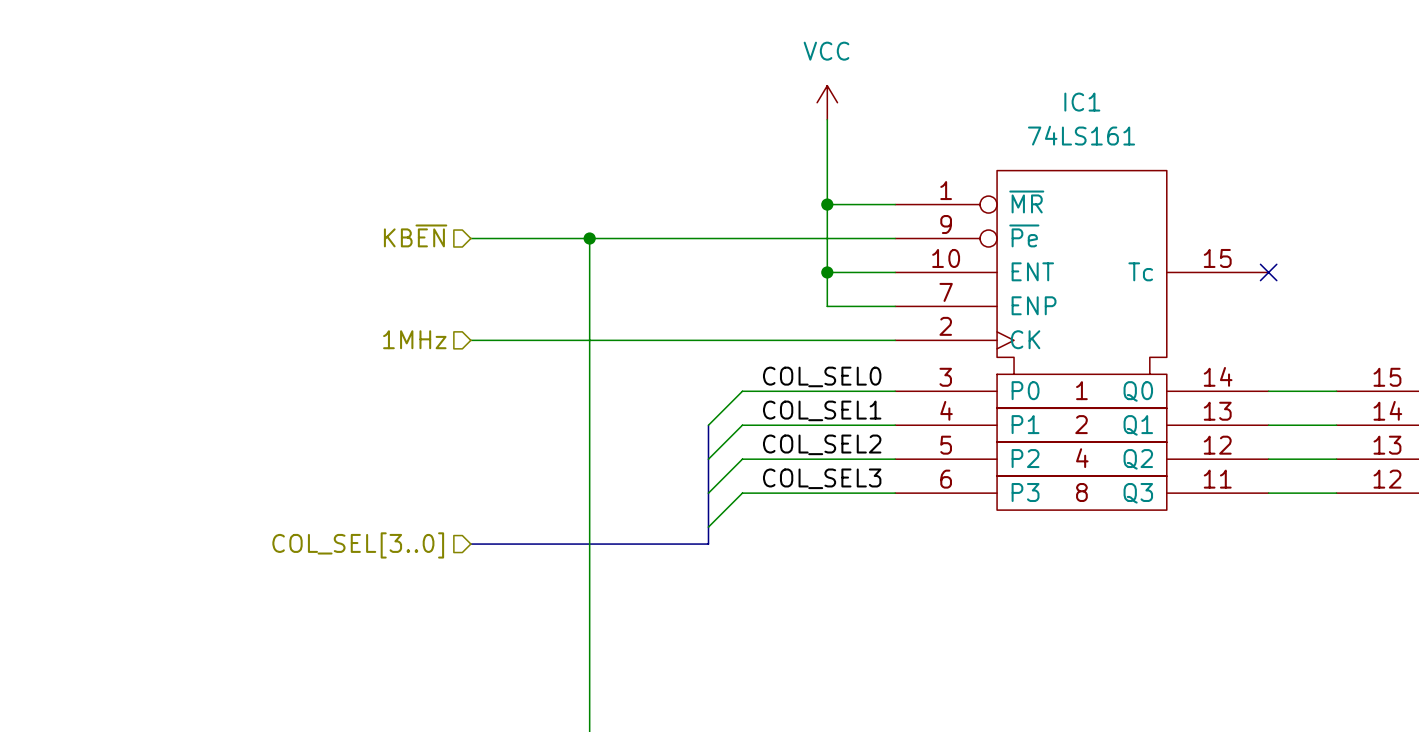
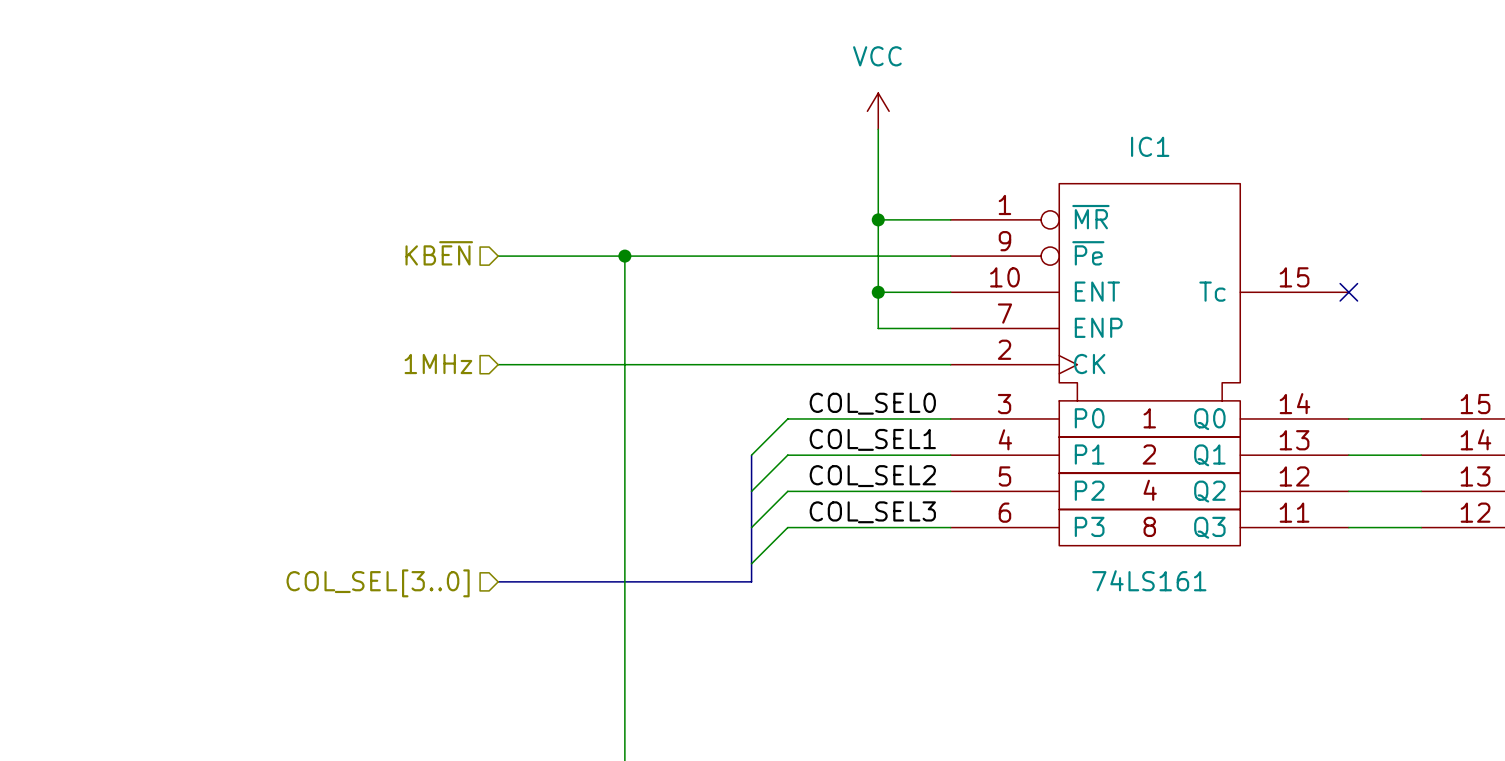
IC1 name position: IC1 (1082, 102) -> IC1 (1150, 146)
IC1 value position: 74LS161 (1081, 135) -> 74LS161 (1149, 580)

